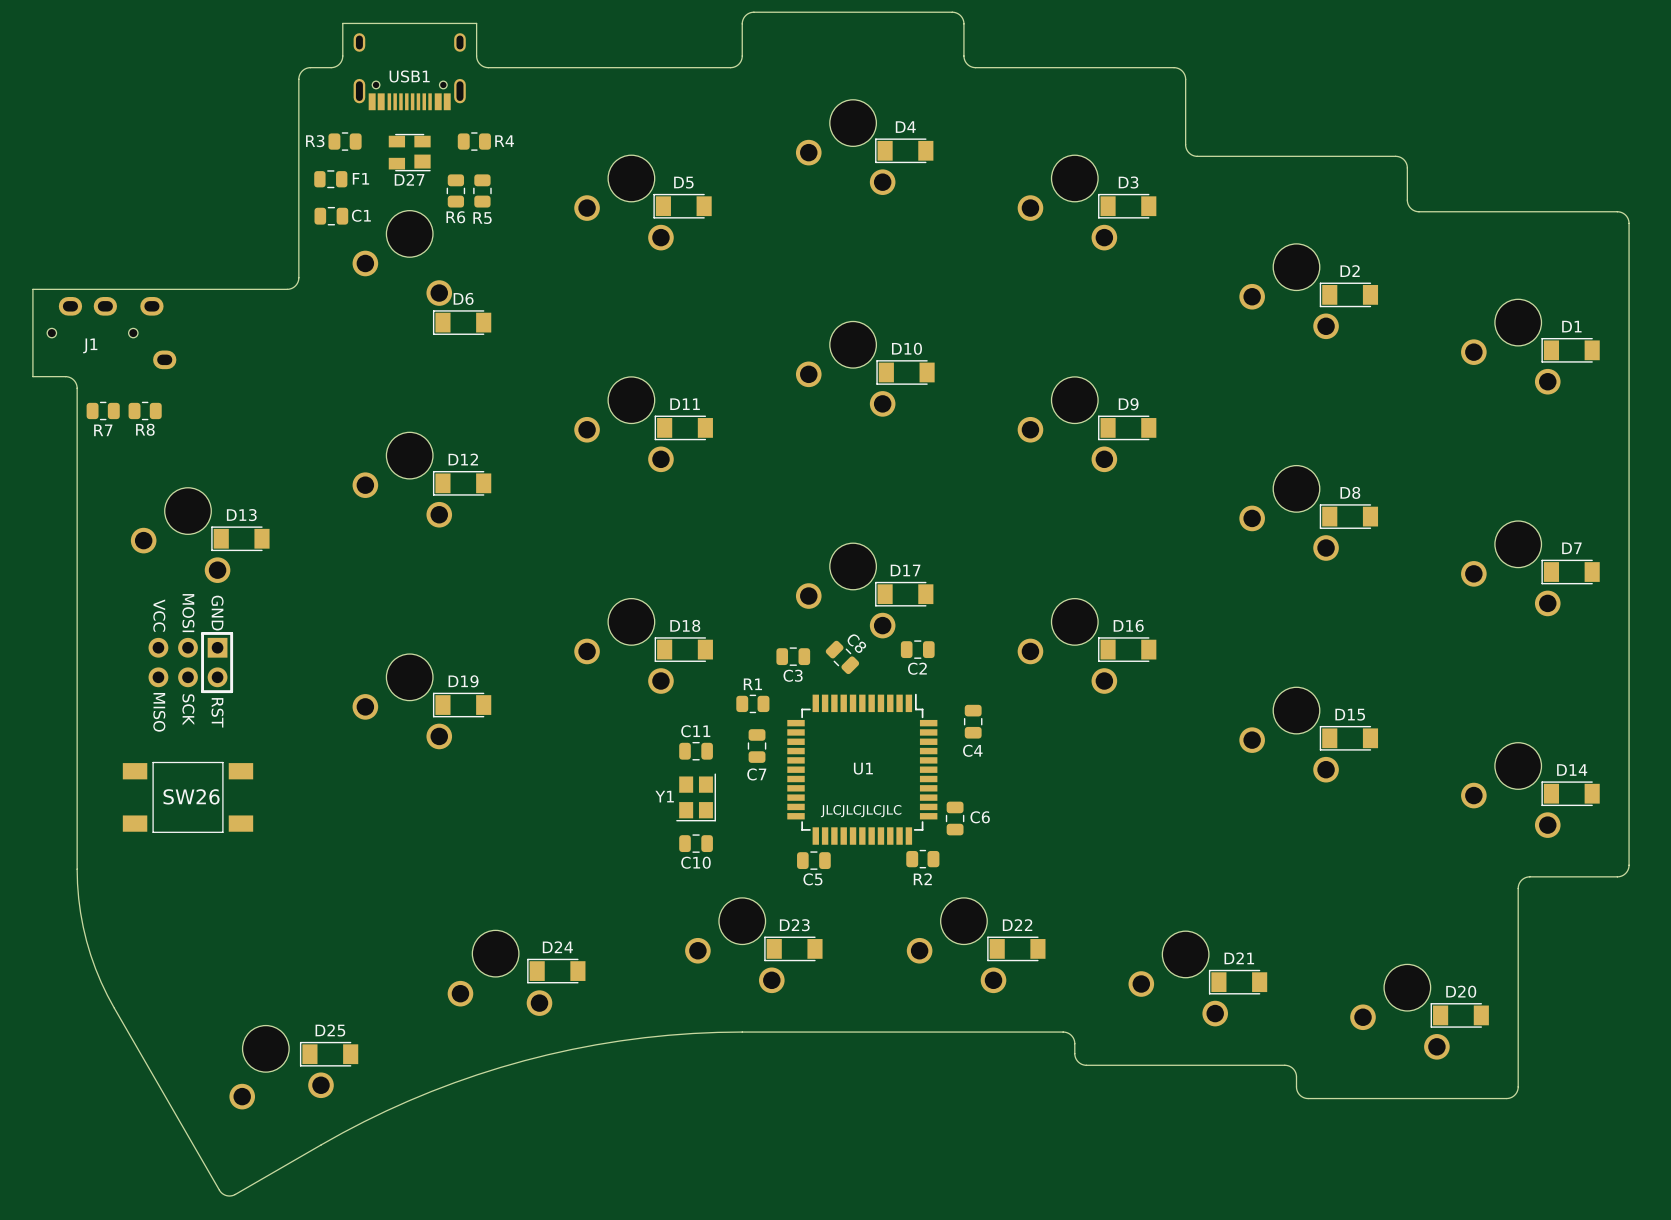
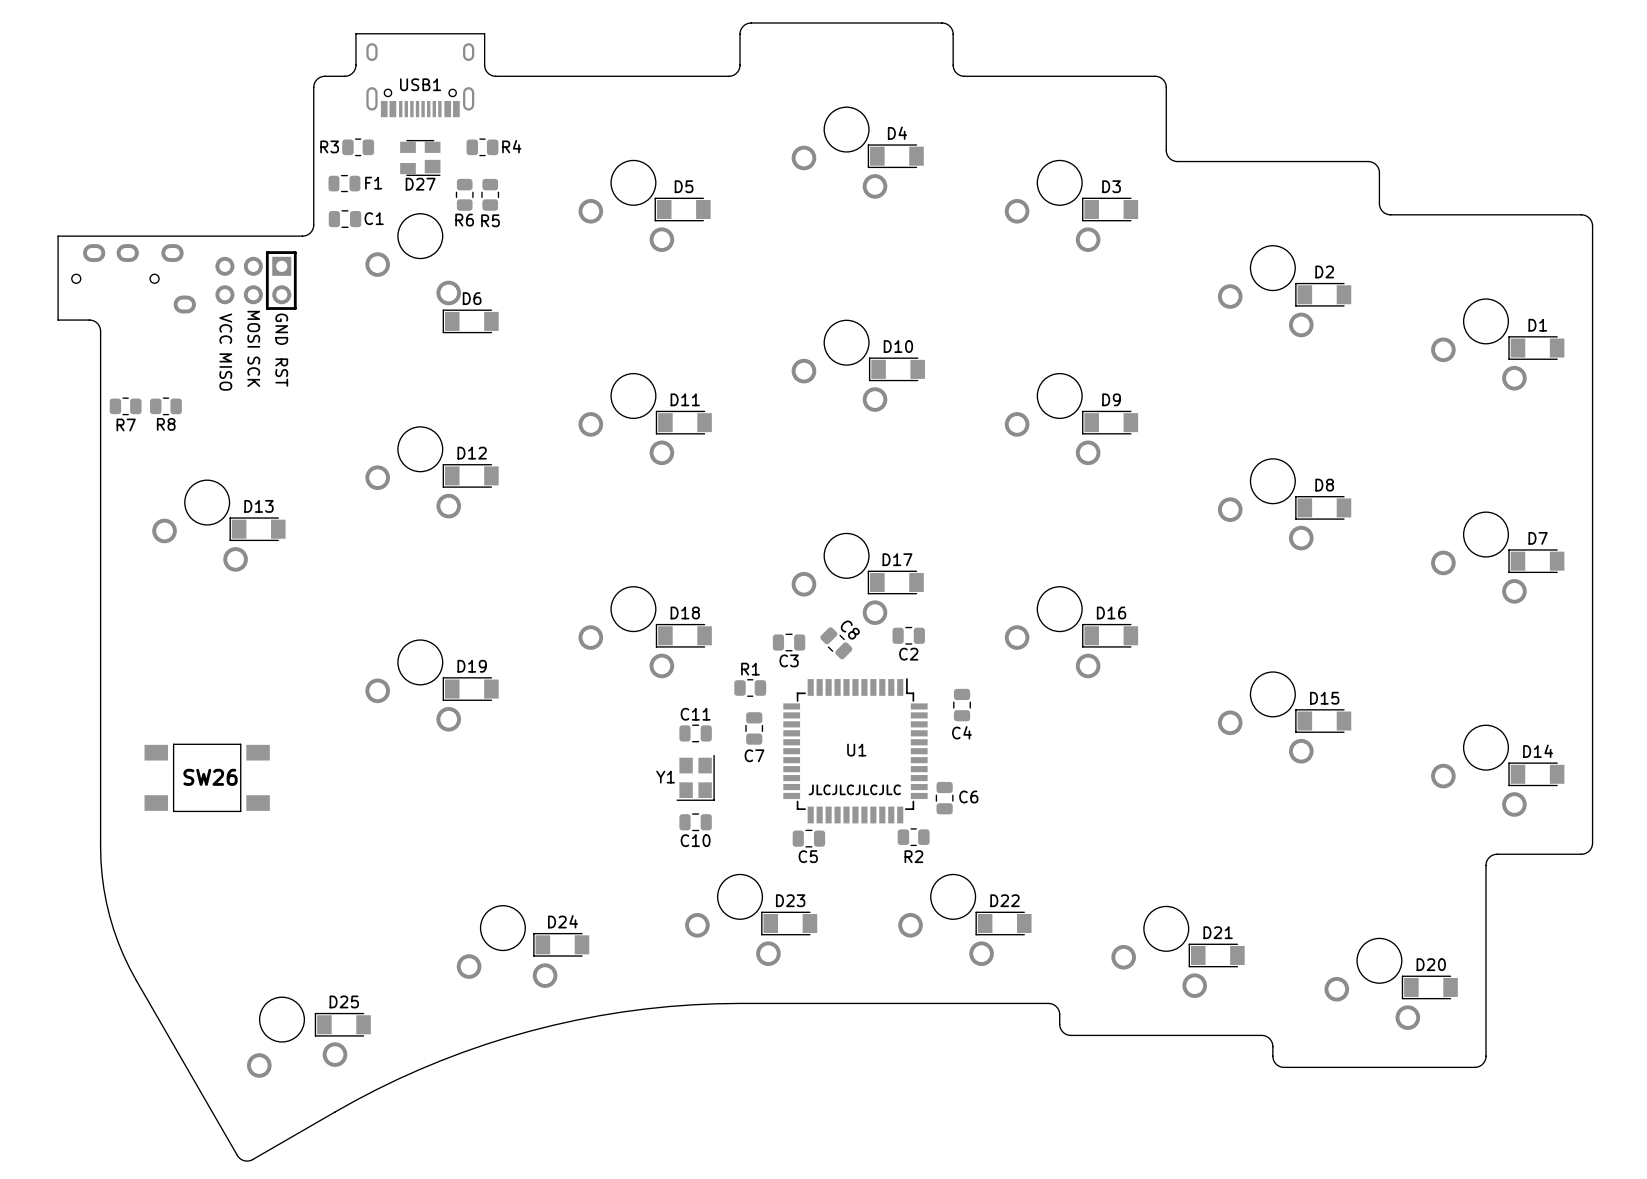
board edge: (298, 222) (298, 279) (296, 284) (290, 288) (32, 289) -> (313, 224) (310, 232) (302, 236) (58, 236) (58, 289)
part: none -> (133, 278)
part: none -> (256, 280)
board edge: (32, 321) (32, 376) (68, 377) (74, 381) (77, 388) -> (58, 320) (90, 320) (99, 325) (100, 384)
J1: (111, 333) -> none
part: (190, 662) -> none

